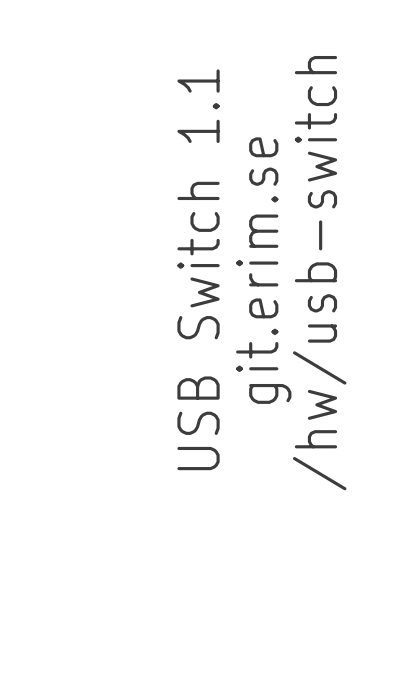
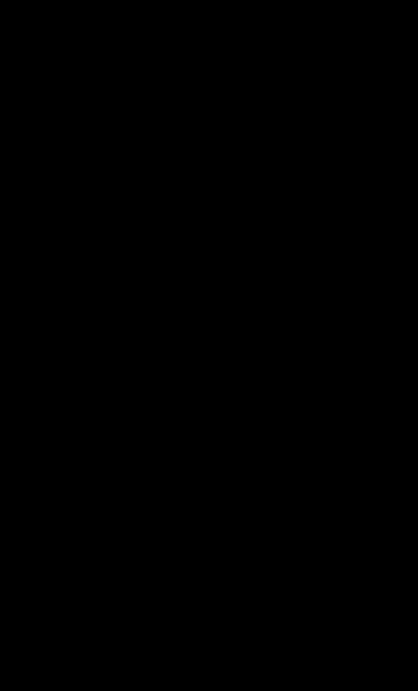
text: USB Switch 1.1 (198, 269) -> none
text: git.erim.se (263, 270) -> none
text: /hw/usb-switch (319, 273) -> none

